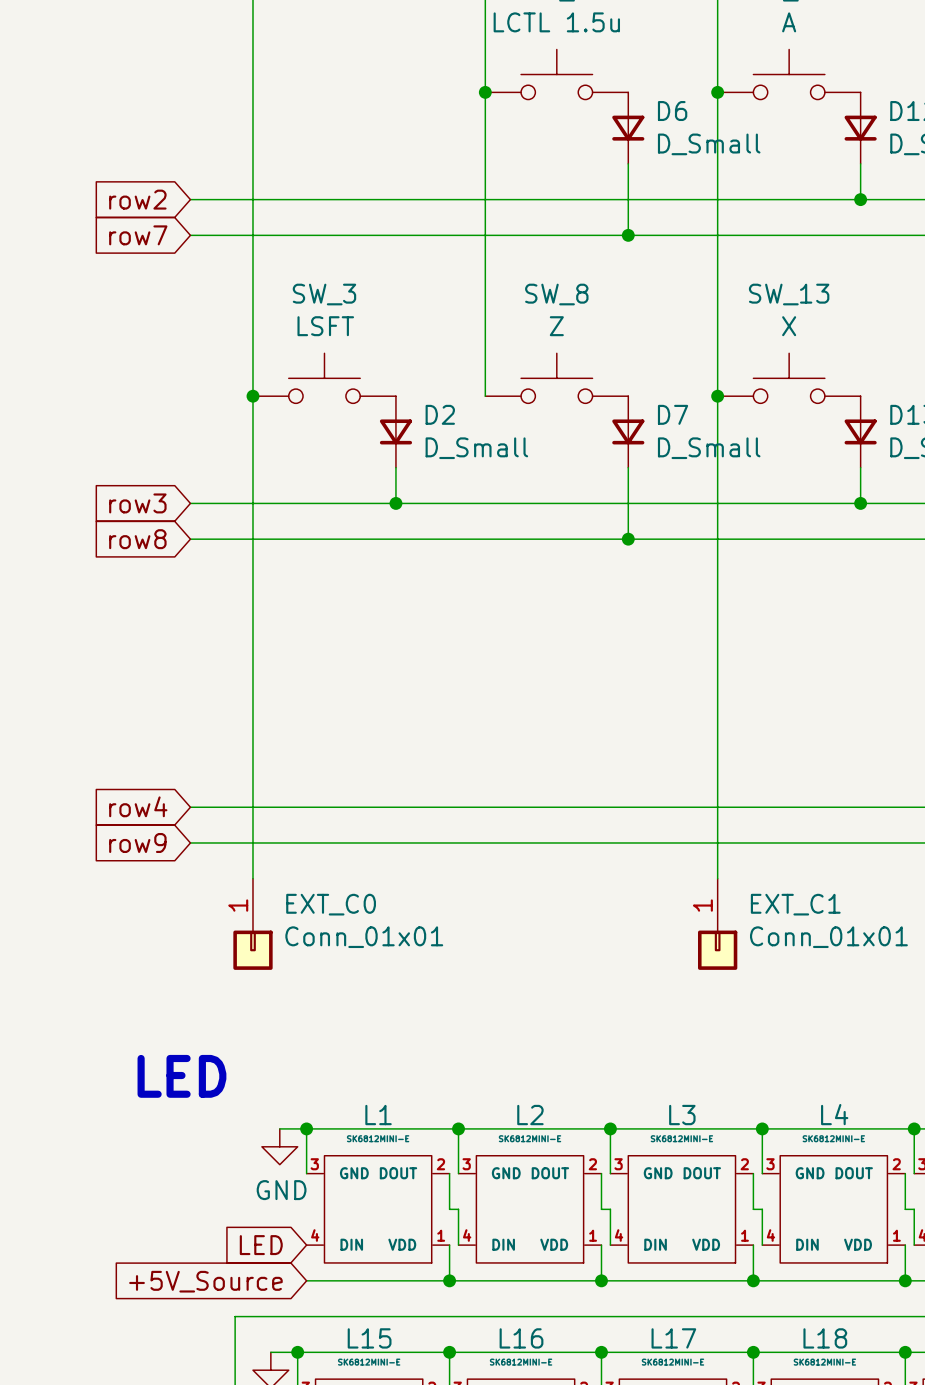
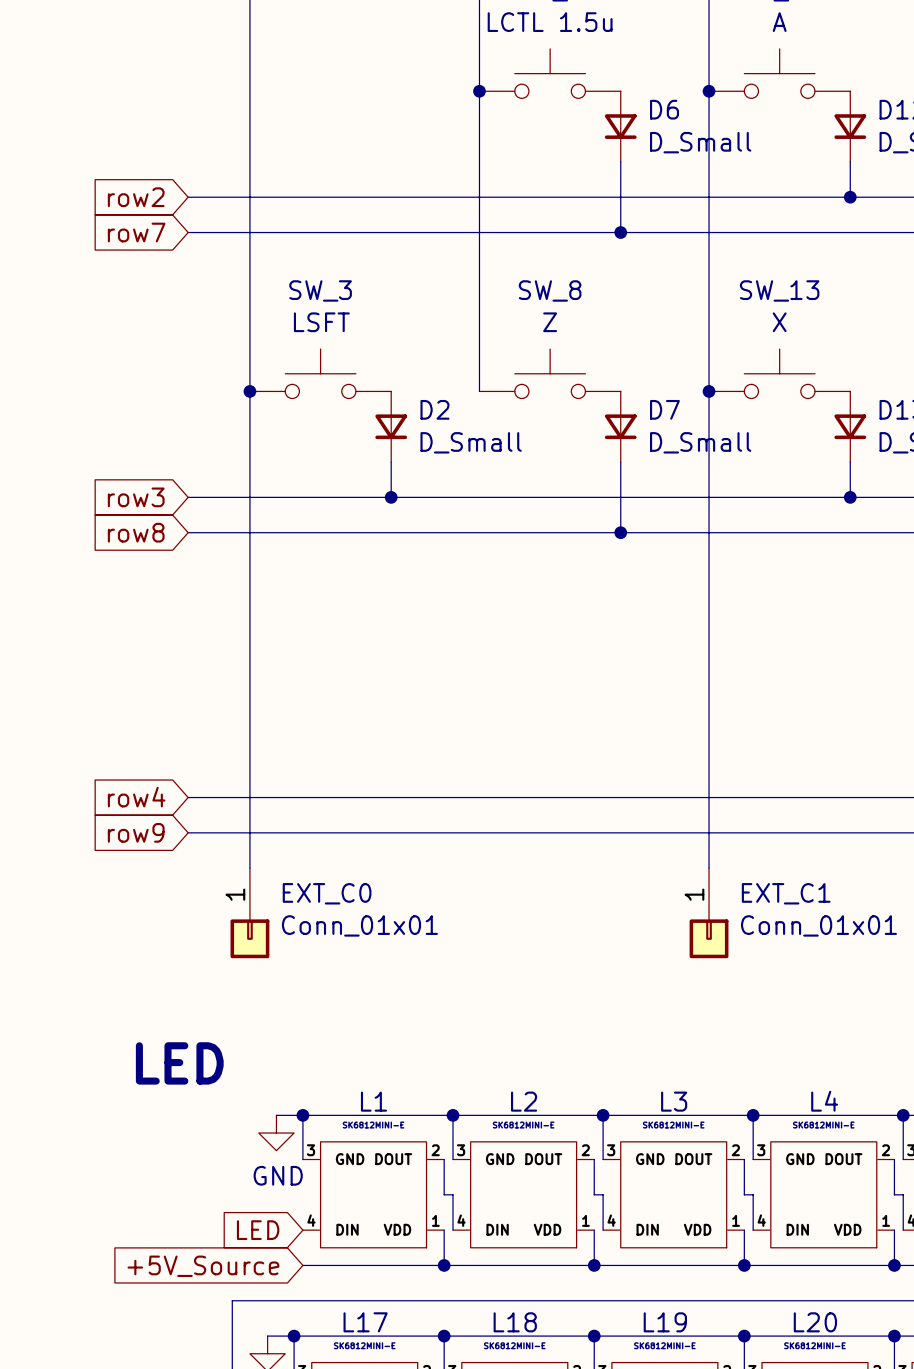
L15 name: L15 (369, 1338) -> L17 (365, 1322)
L16 name: L16 (521, 1338) -> L18 (515, 1322)
L17 name: L17 (673, 1338) -> L19 (665, 1322)
L18 name: L18 (825, 1338) -> L20 (815, 1322)

